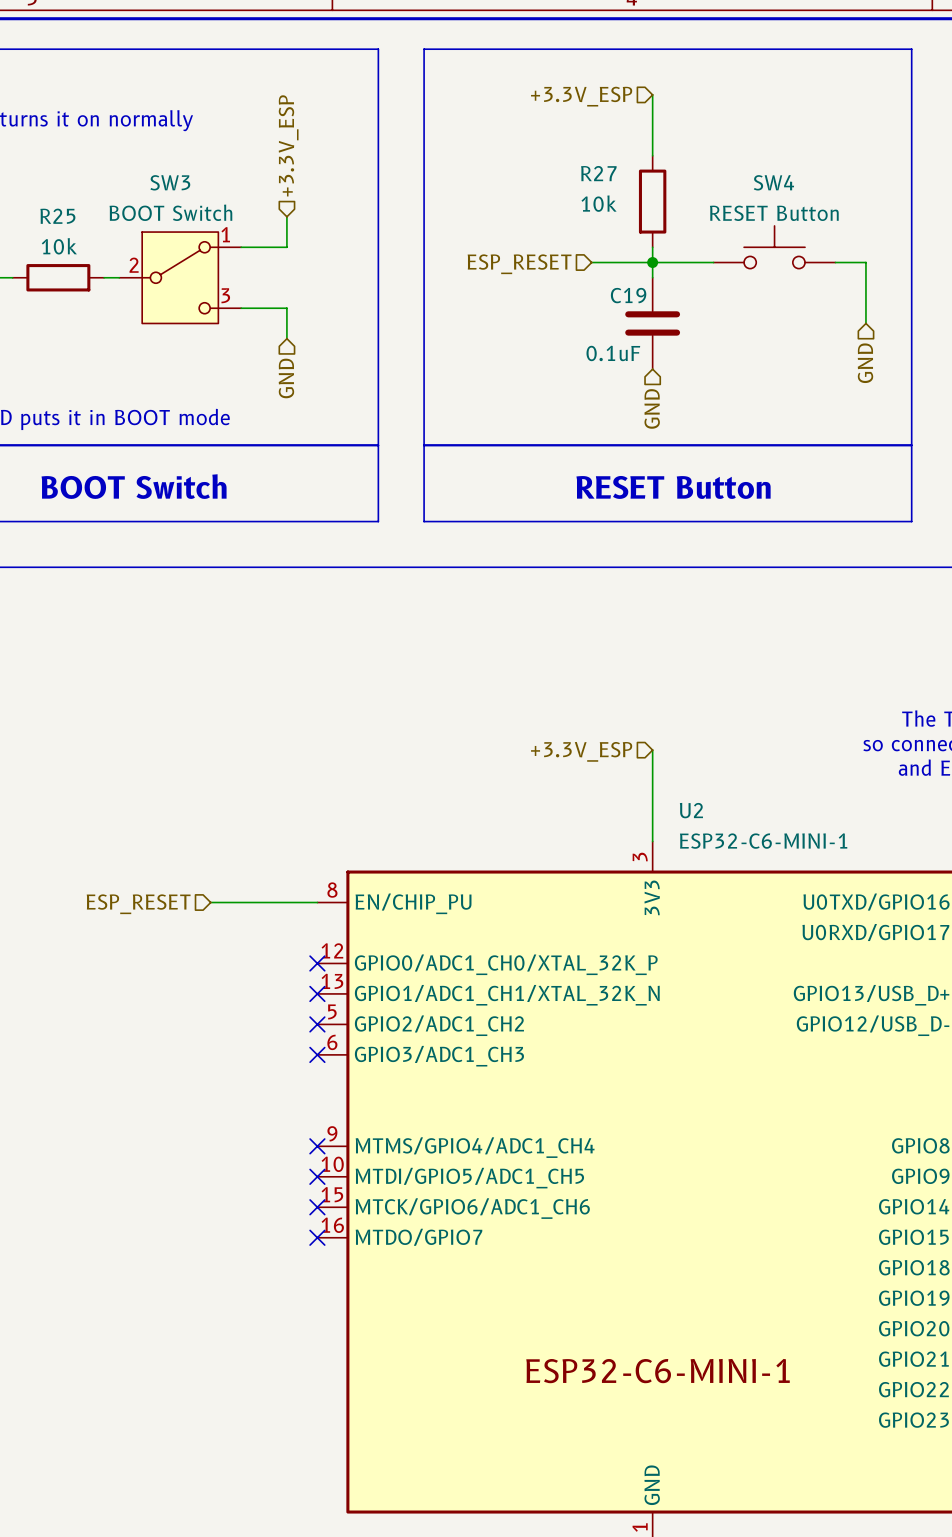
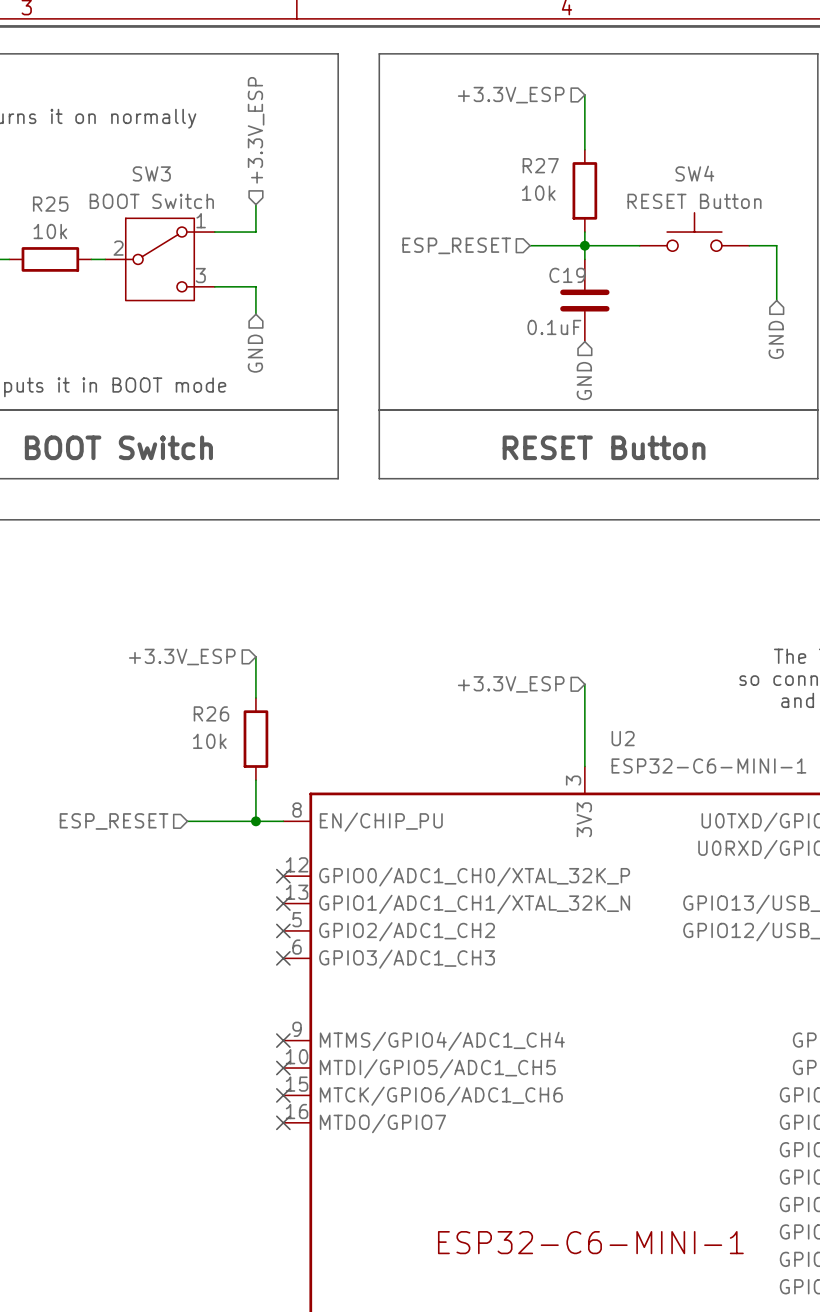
wire: none -> (255, 656) (255, 697)
hierarchical label: none -> +3.3V_ESP (182, 657)
R26: none -> 10k (255, 739)
wire: none -> (255, 780) (255, 821)
junction: none -> (255, 821)

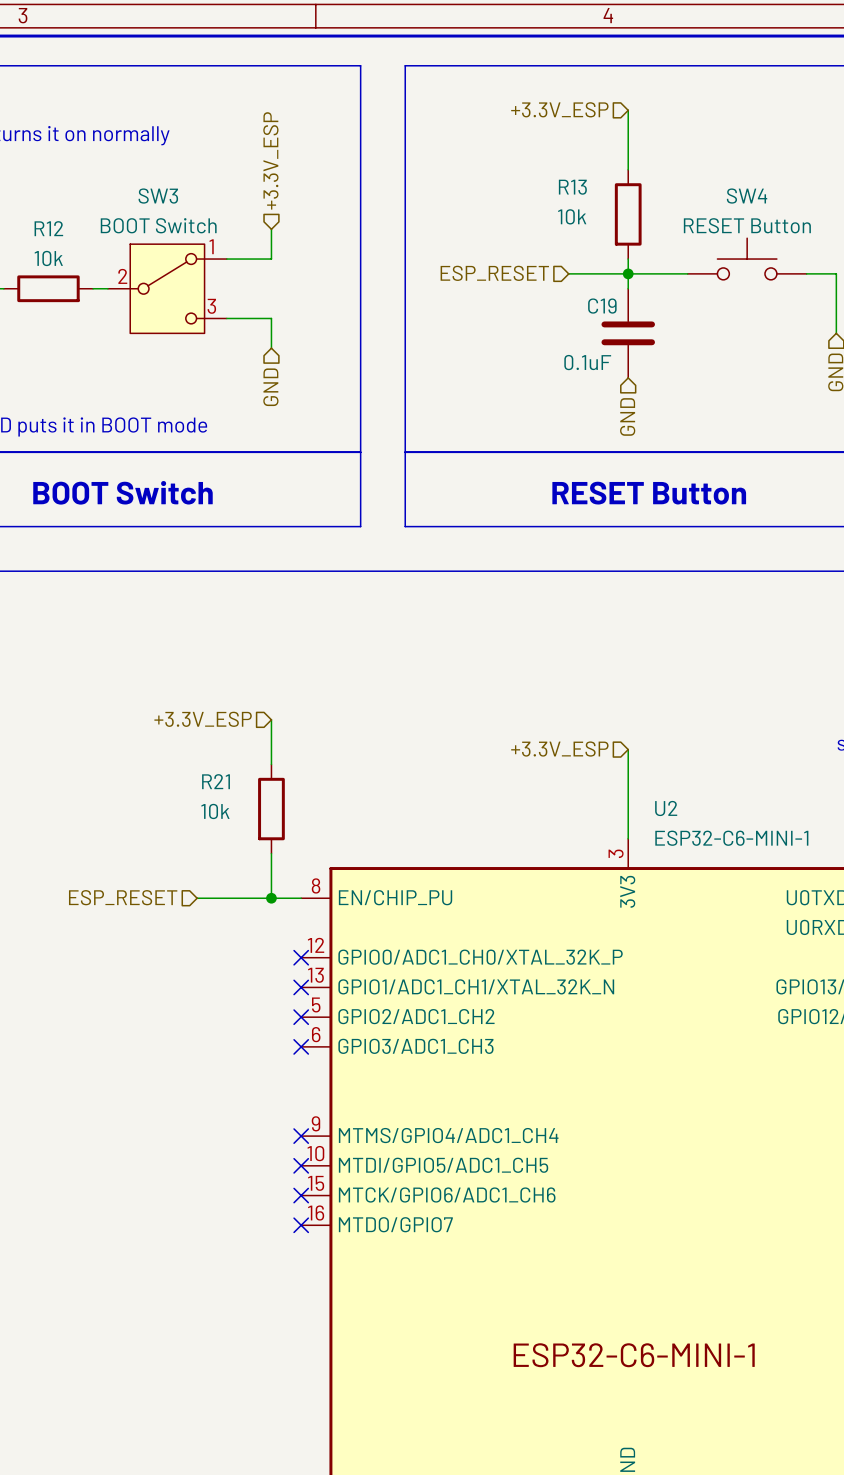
R27 name: R27 (540, 165) -> R13 (572, 187)
R25 name: R25 (50, 204) -> R12 (48, 228)
R26 name: R26 (211, 713) -> R21 (216, 781)

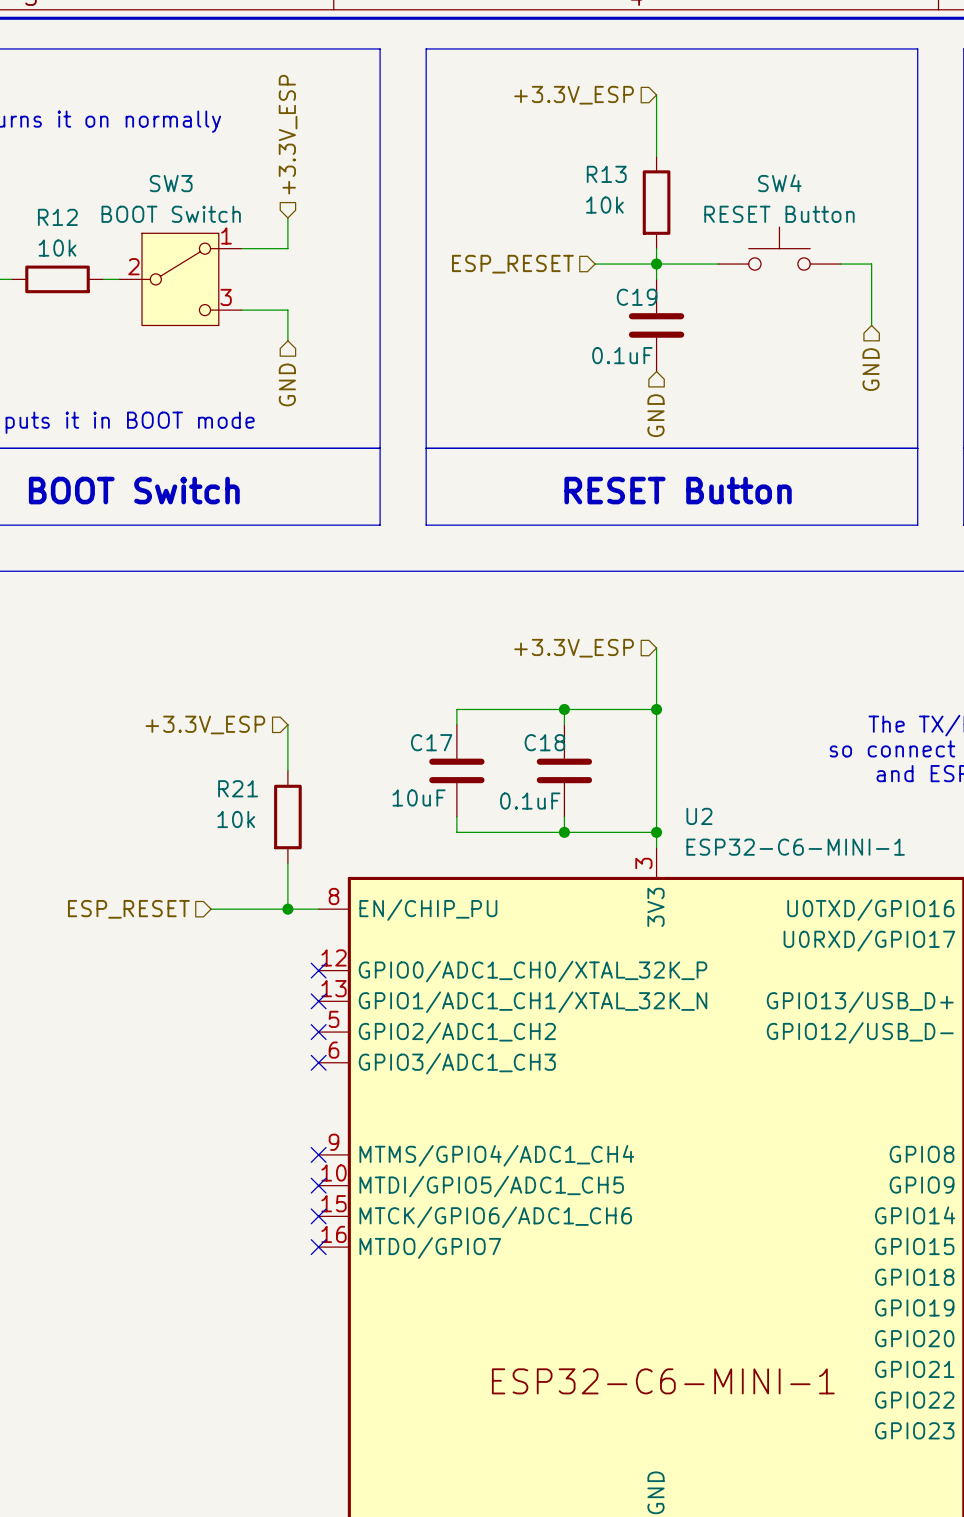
wire: none -> (656, 648) (656, 755)
wire: none -> (564, 709) (564, 724)
junction: none -> (564, 709)
wire: none -> (656, 709) (456, 709) (456, 724)
junction: none -> (656, 709)
hierarchical label position: +3.3V_ESP (559, 749) -> +3.3V_ESP (574, 648)
C17: none -> 10uF (456, 770)
C18: none -> 0.1uF (564, 770)
wire: none -> (456, 817) (456, 832) (656, 832)
wire: none -> (564, 817) (564, 832)
junction: none -> (564, 832)
junction: none -> (656, 832)

